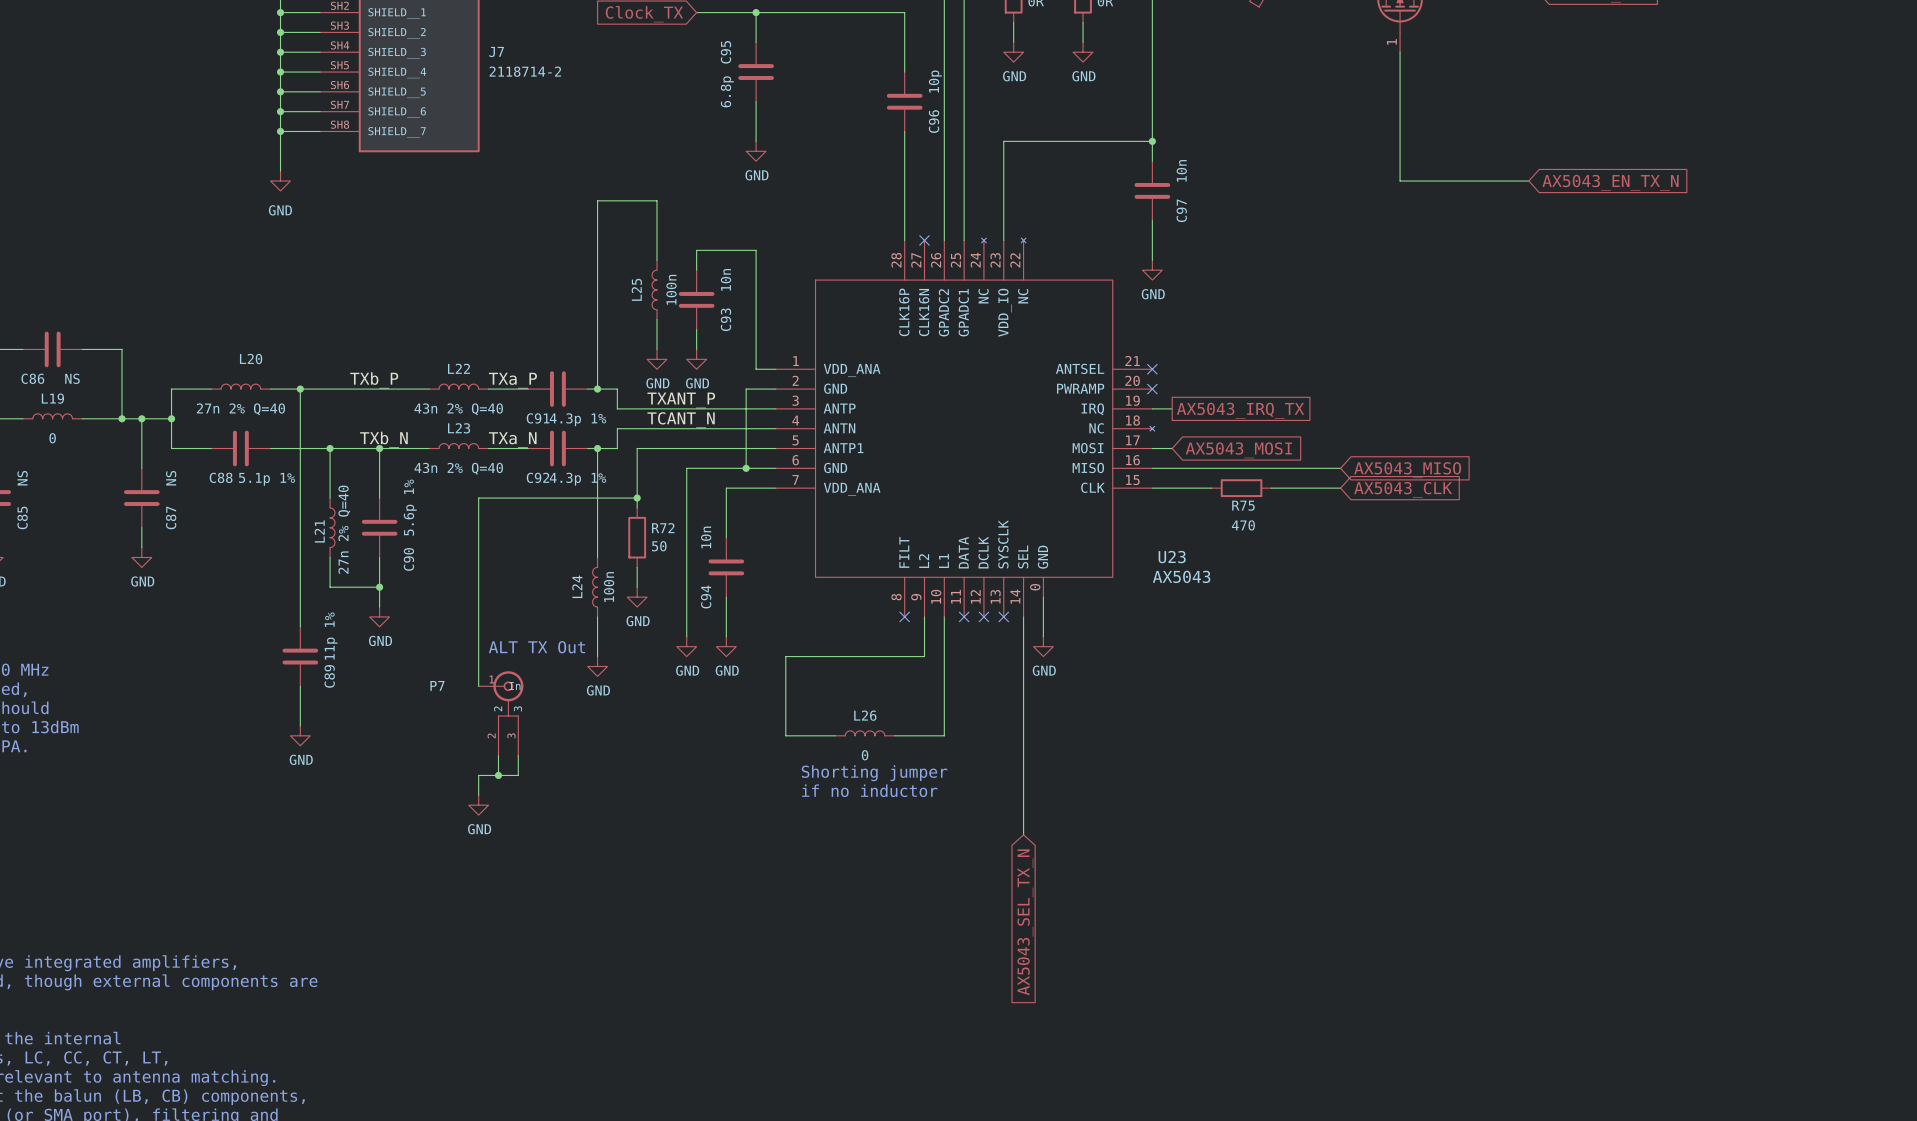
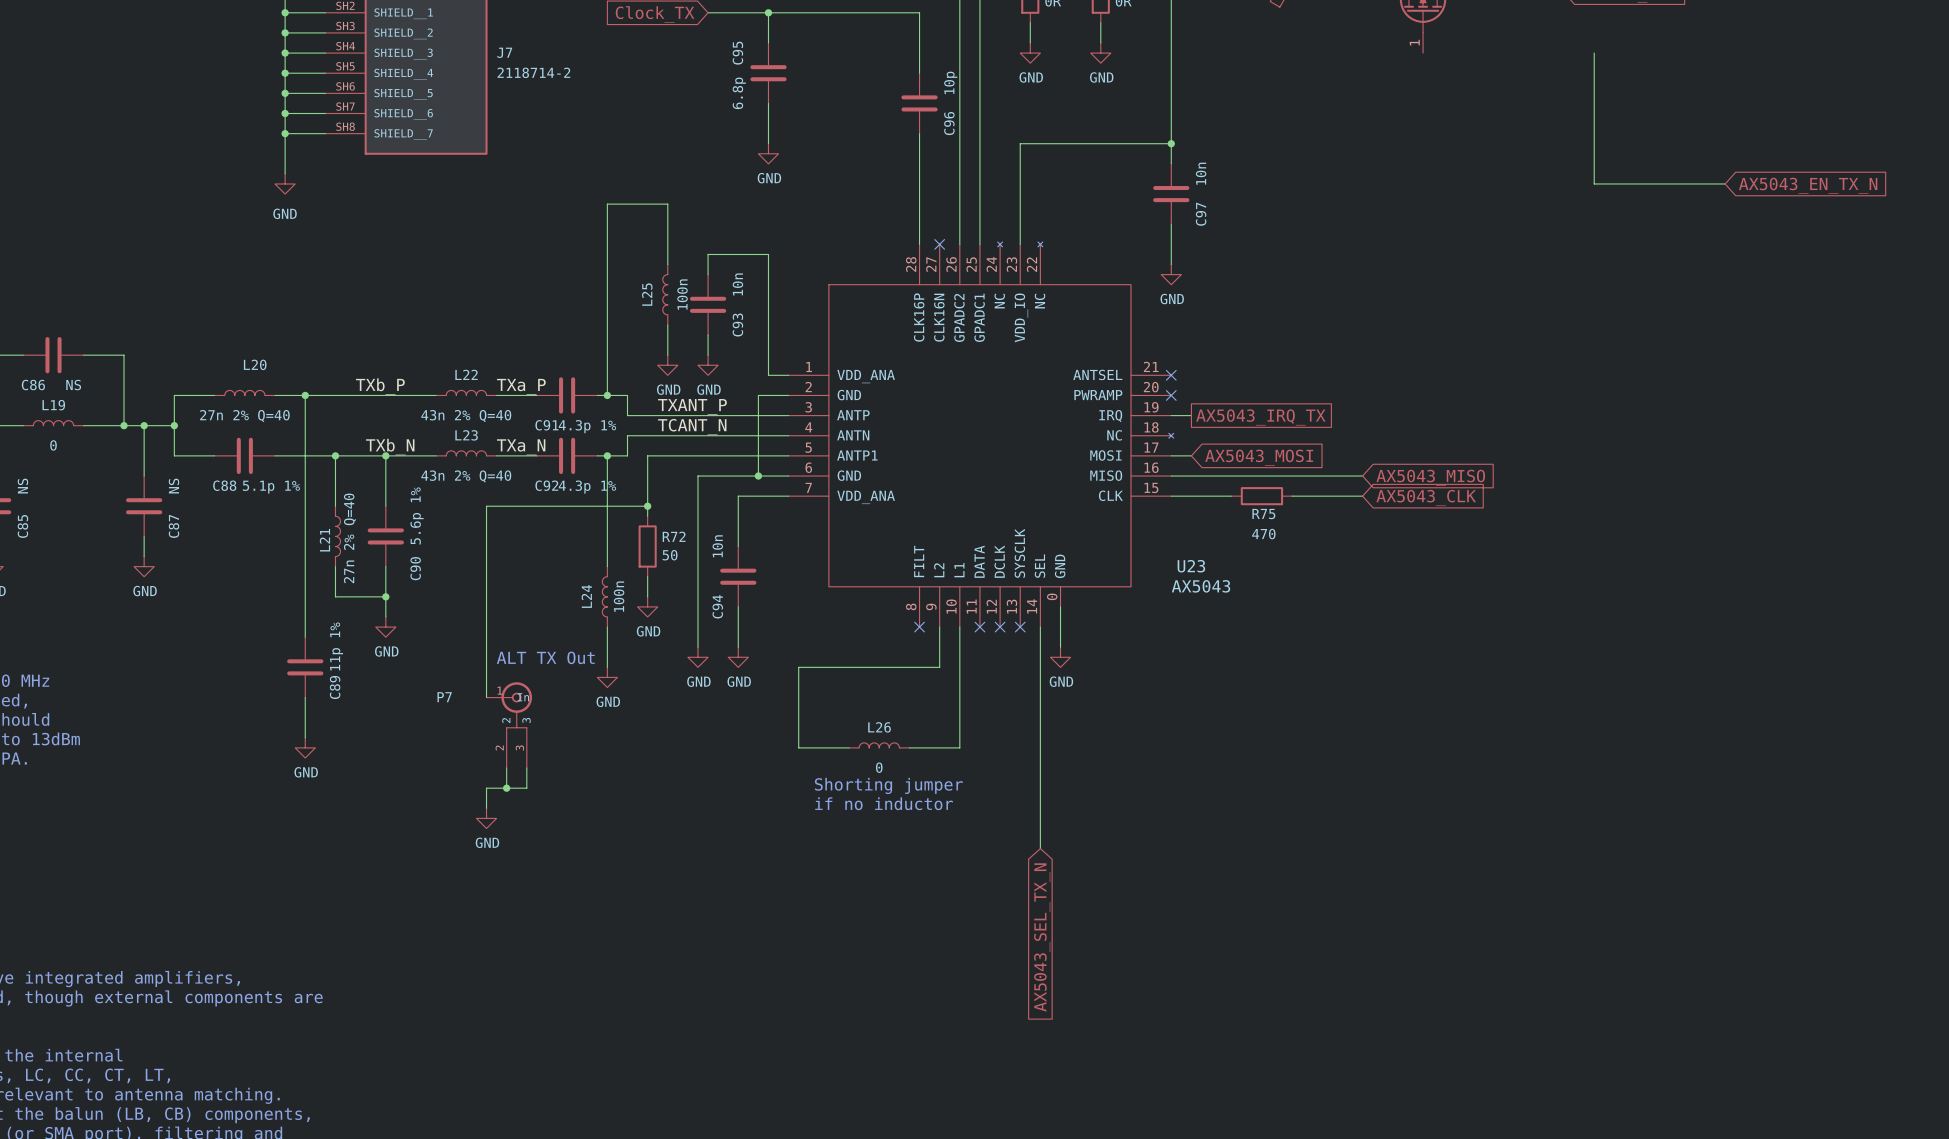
wire: (1400, 52) (1400, 181) (1528, 181) -> (1594, 53) (1594, 183) (1725, 183)
global label position: AX5043_EN_TX_N (1610, 182) -> AX5043_EN_TX_N (1808, 185)

